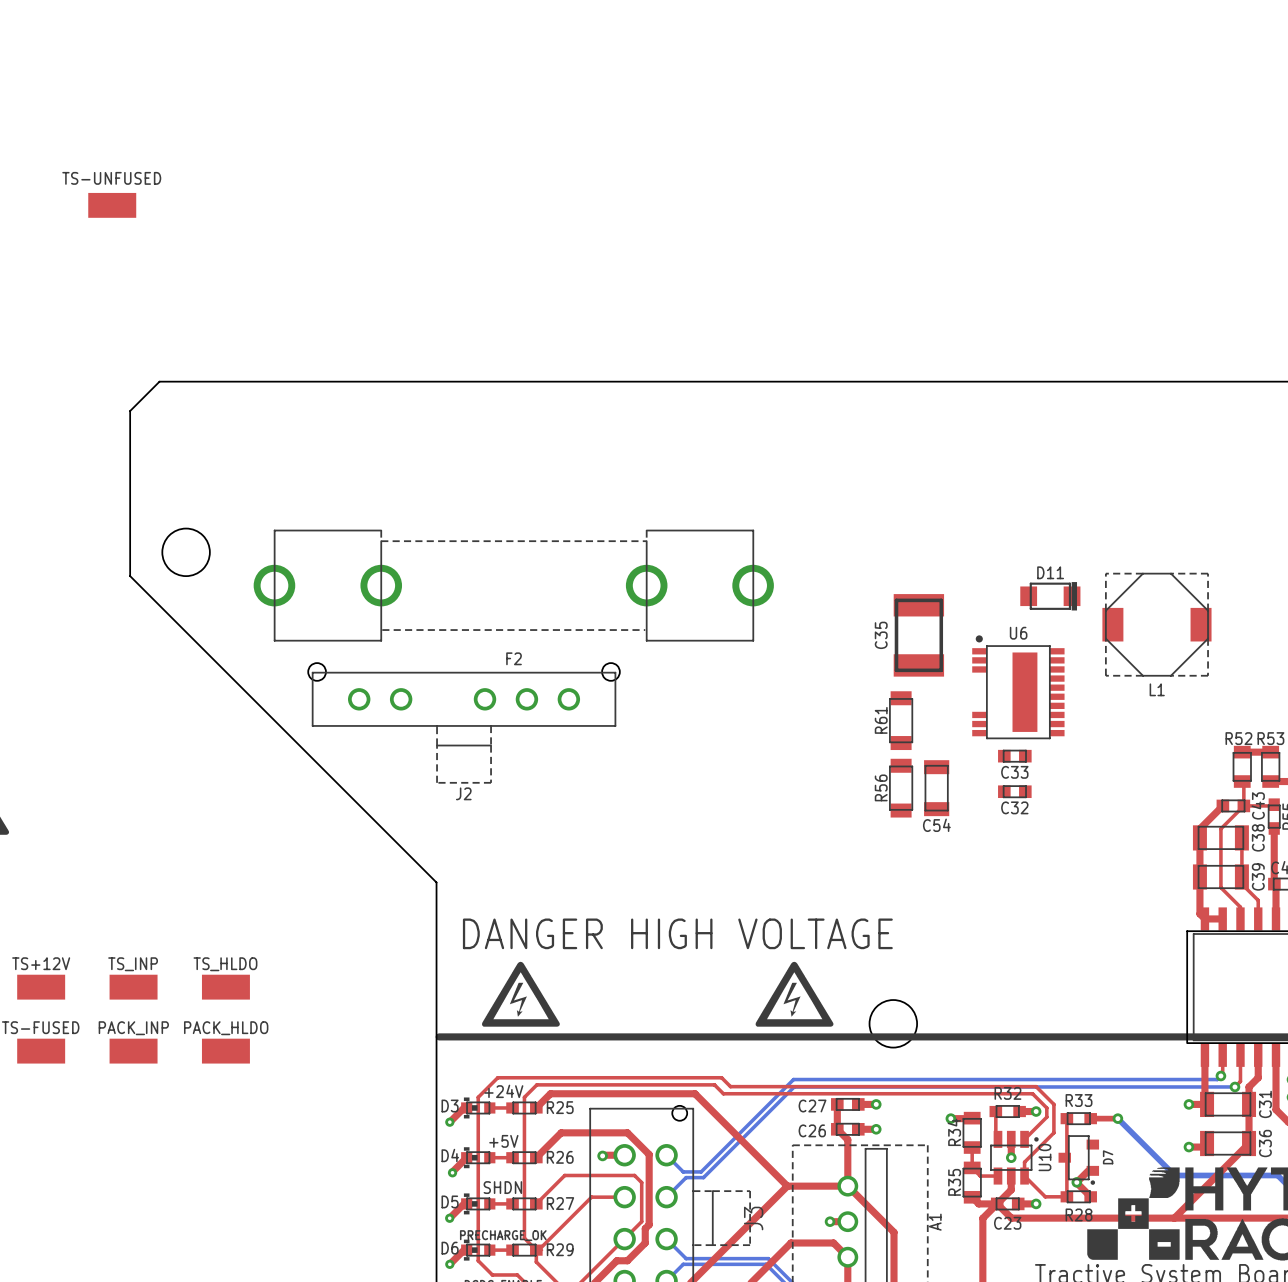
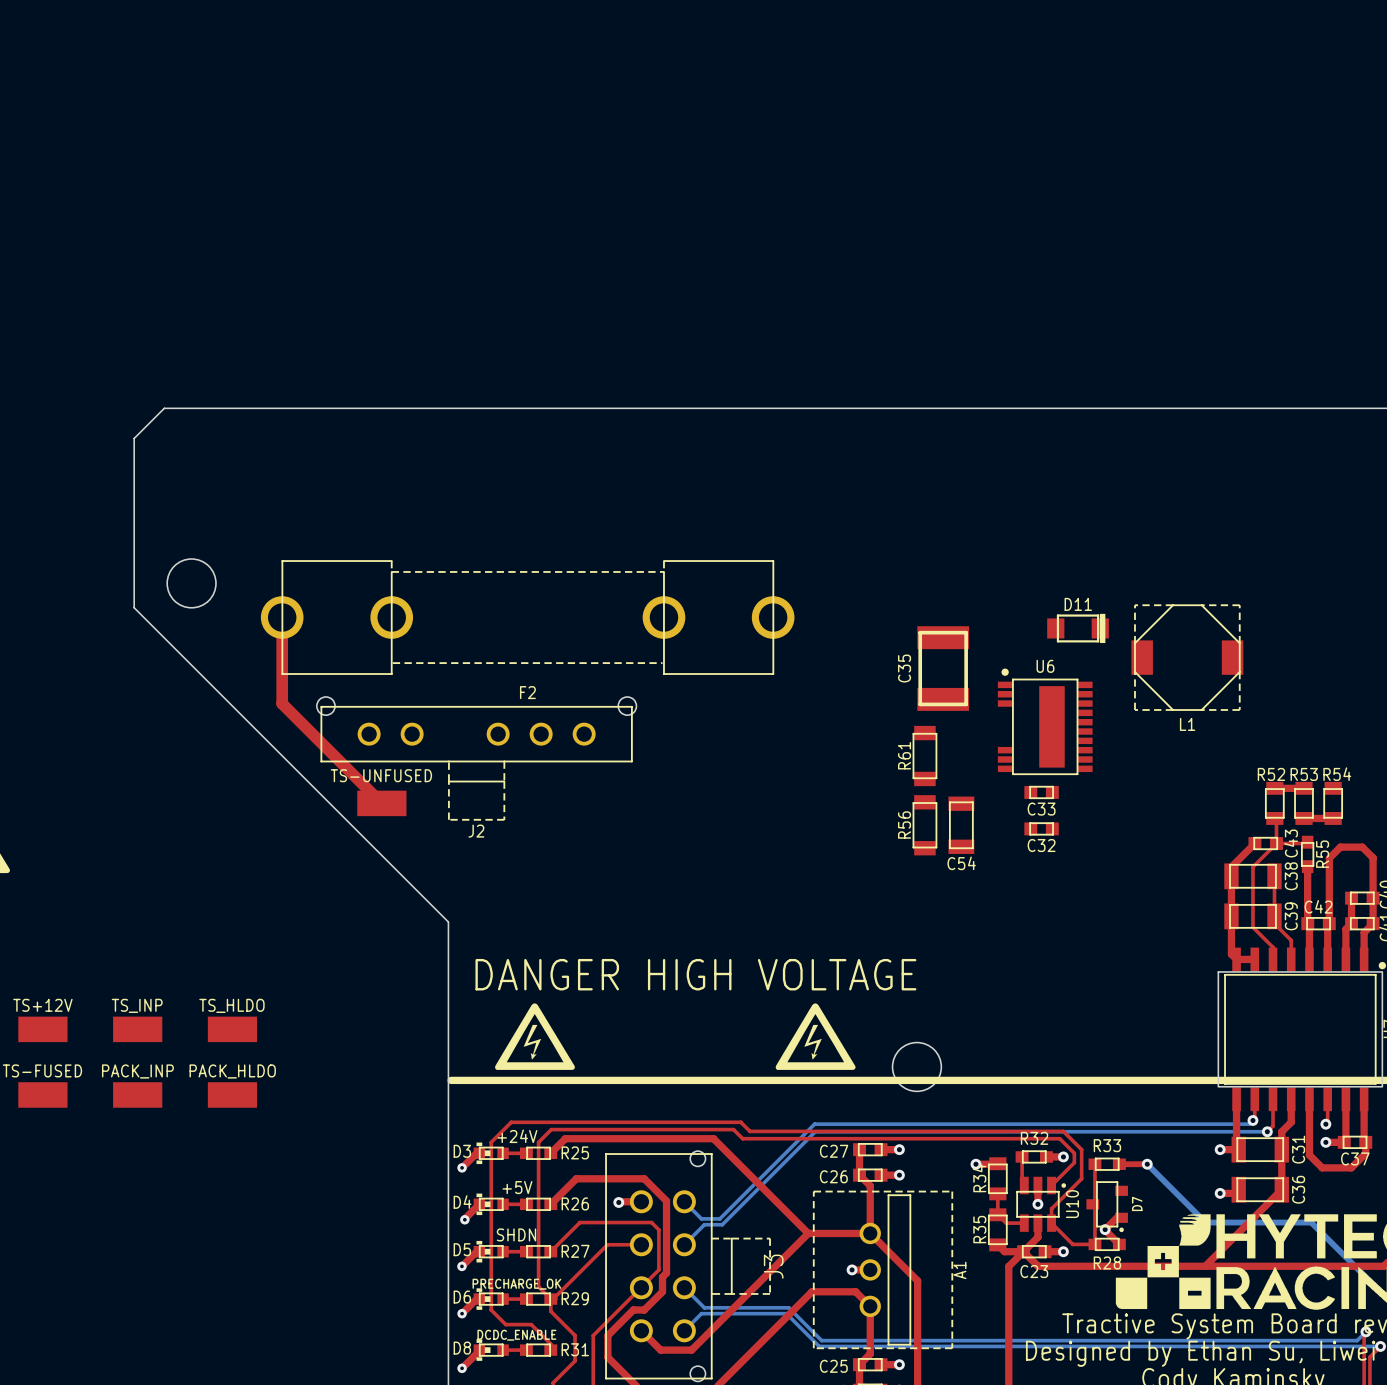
TS-UNFUSED: (112, 205) -> none
top track: none -> (282, 617) (282, 703) (381, 803)
TS-UNFUSED: none -> (381, 803)

